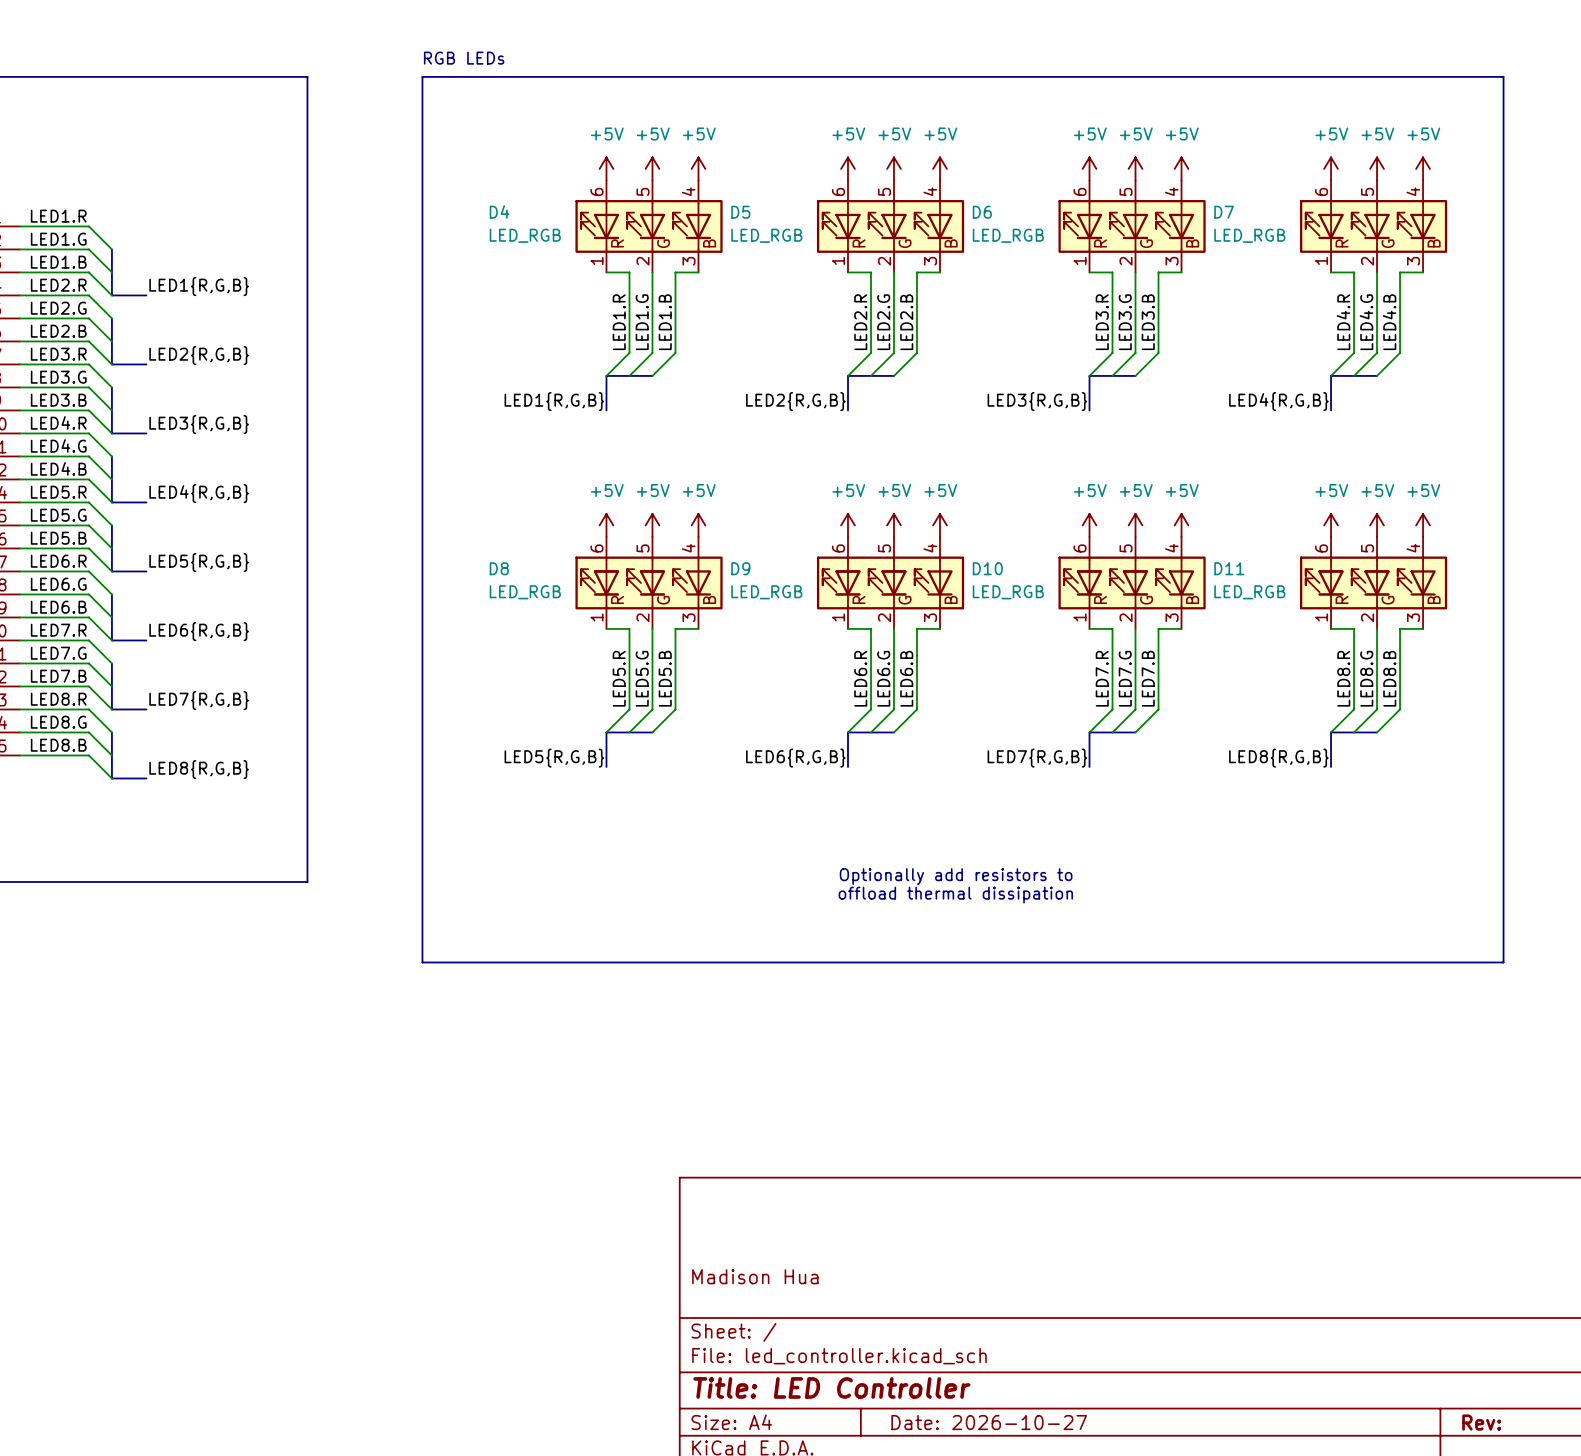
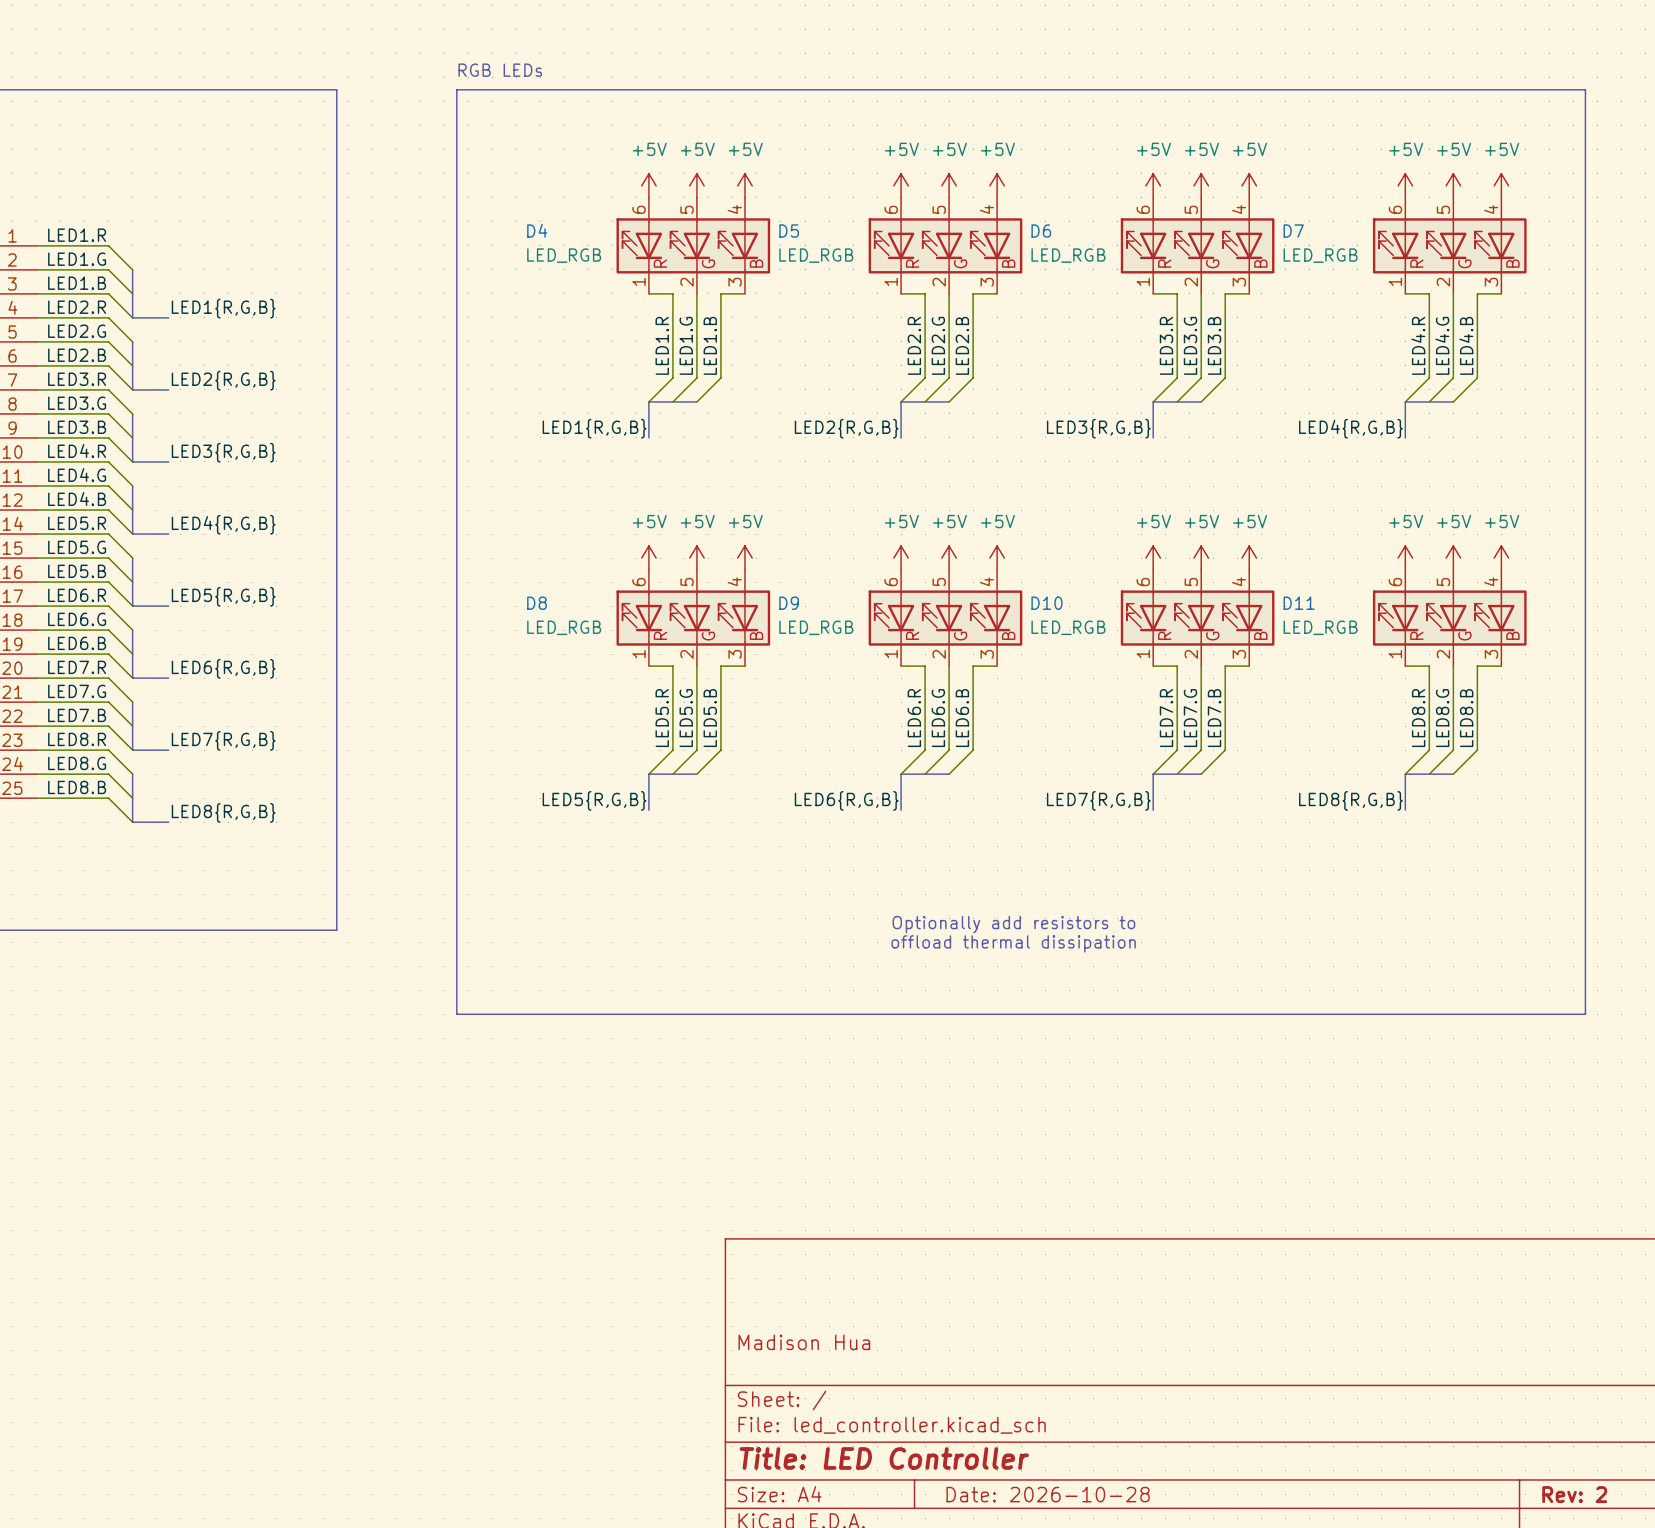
title block: Date: 2026-10-27 (989, 1422) -> Date: 2026-10-28 (1048, 1494)
title block: Rev: (1481, 1422) -> Rev: 2 (1574, 1494)

